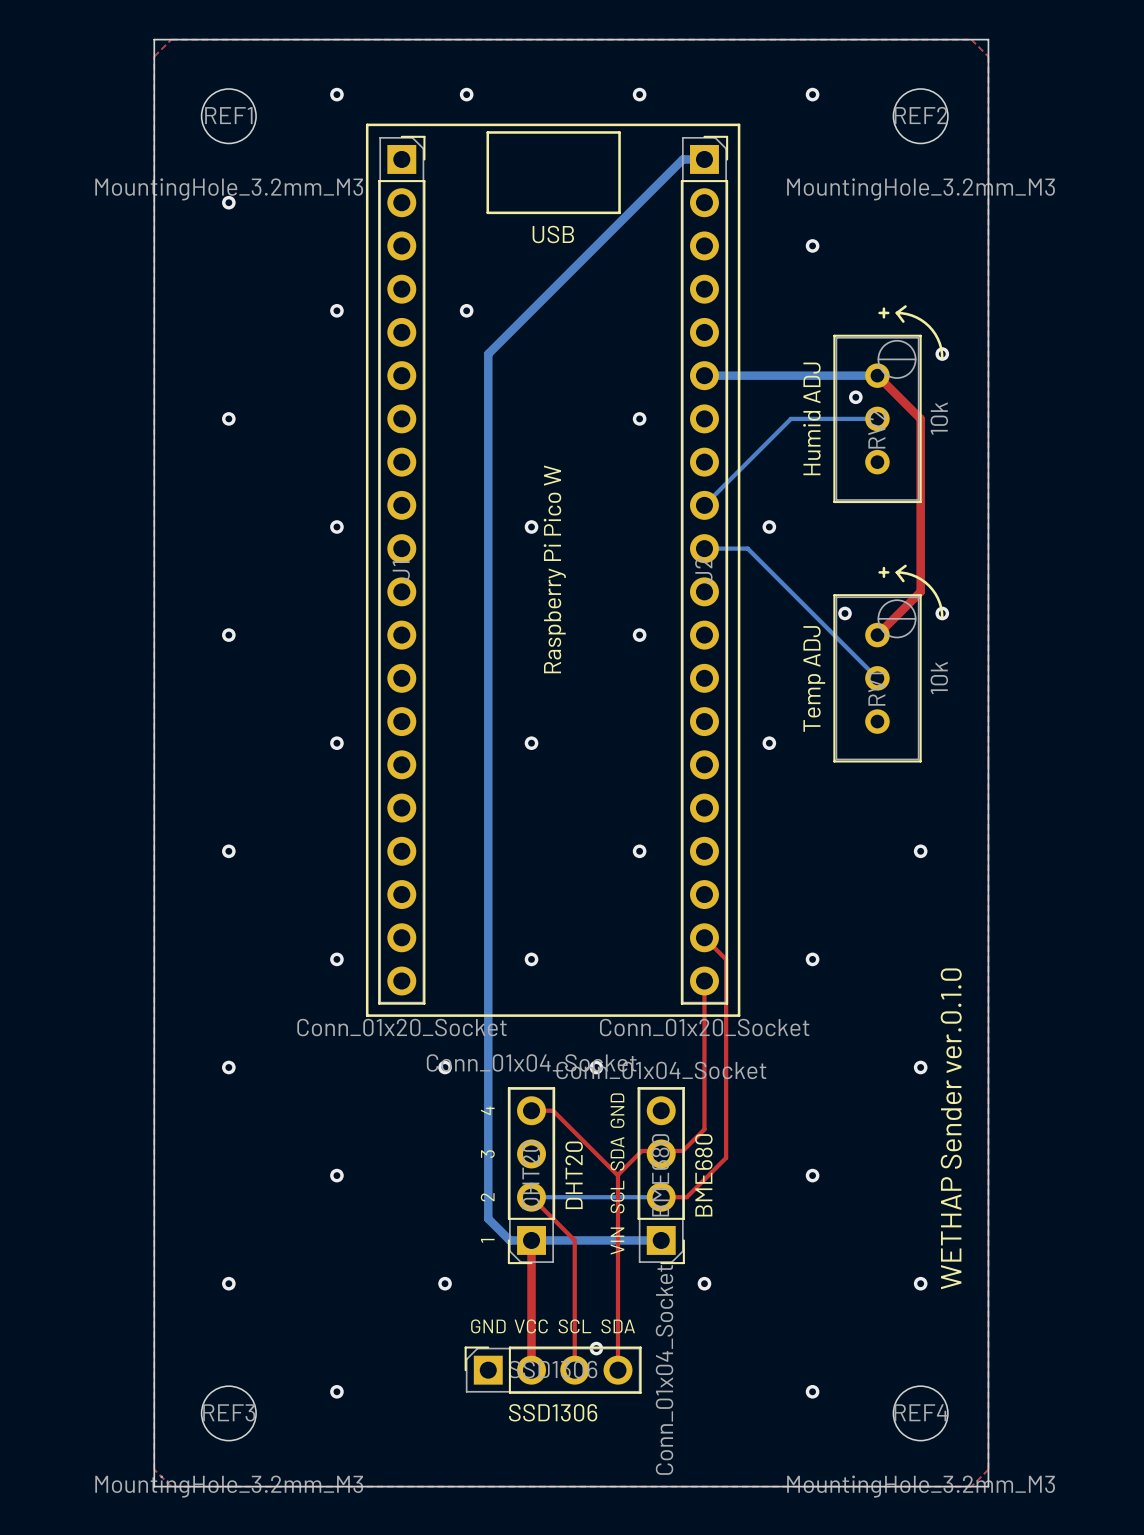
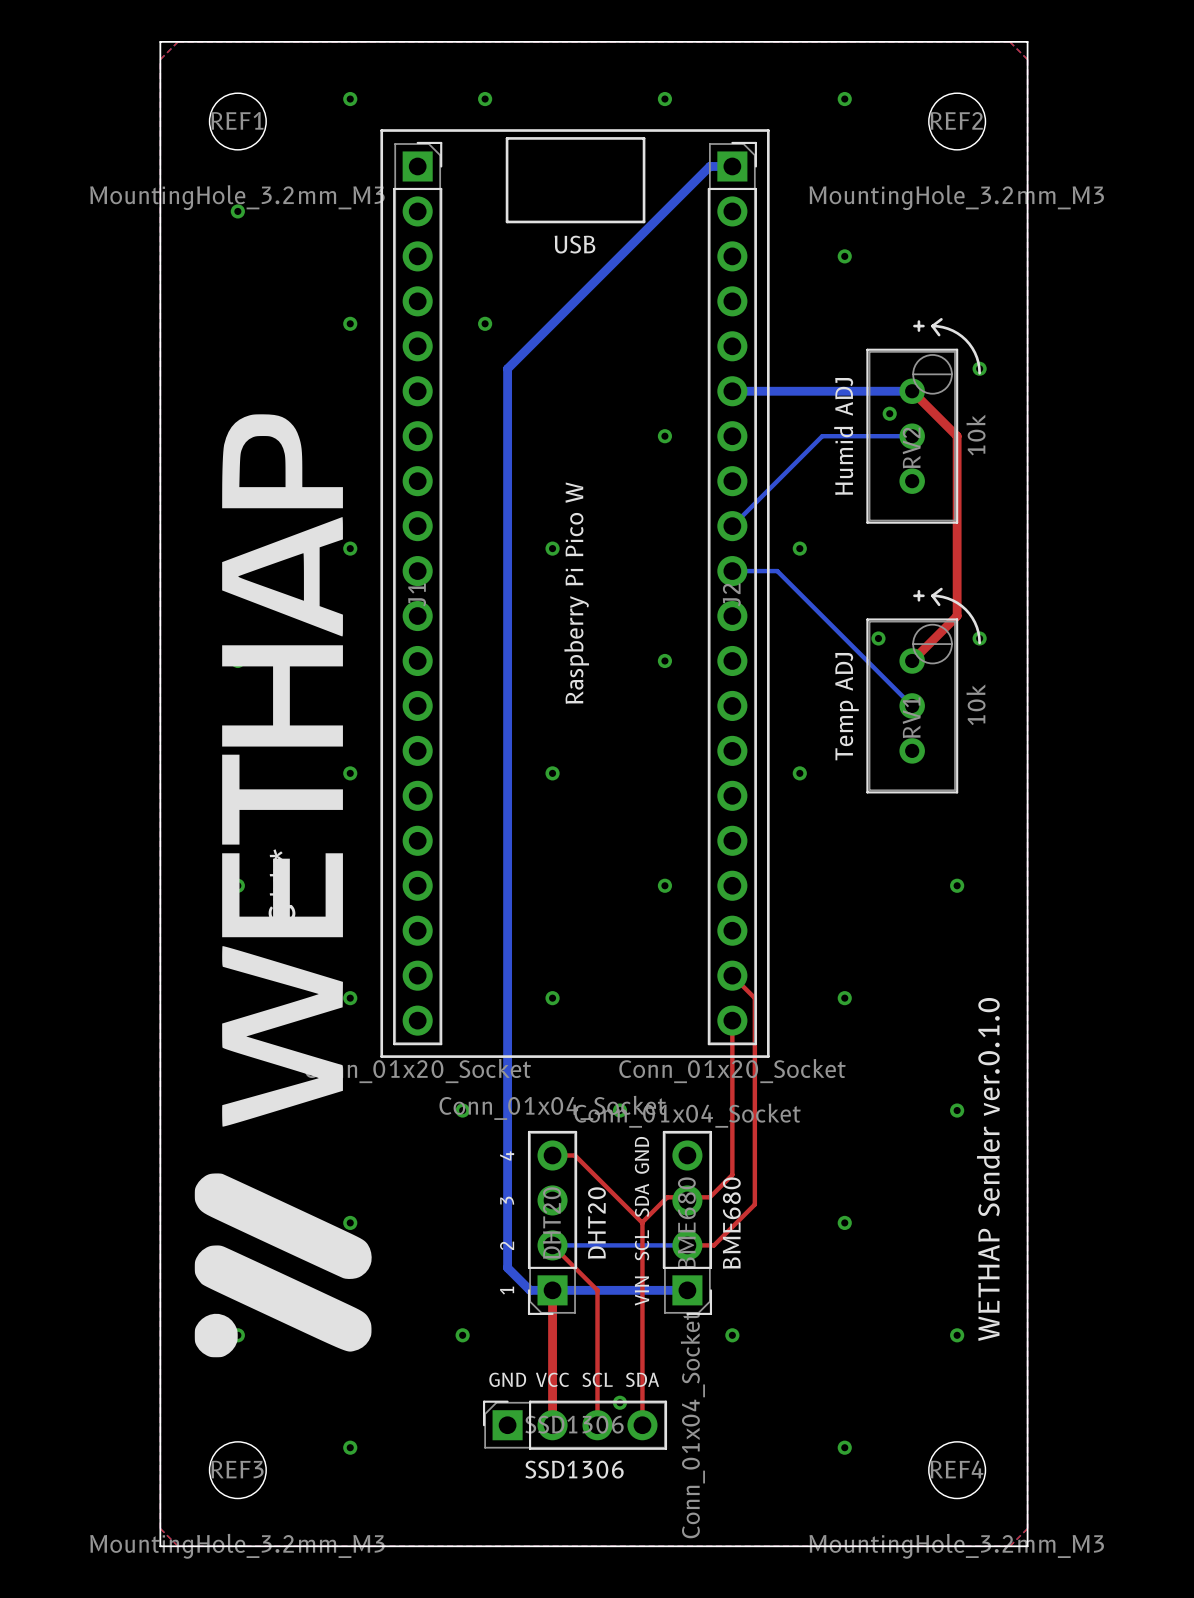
part: none -> (283, 885)

